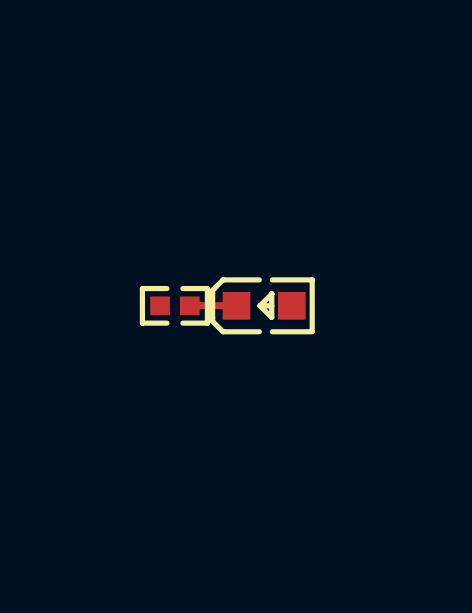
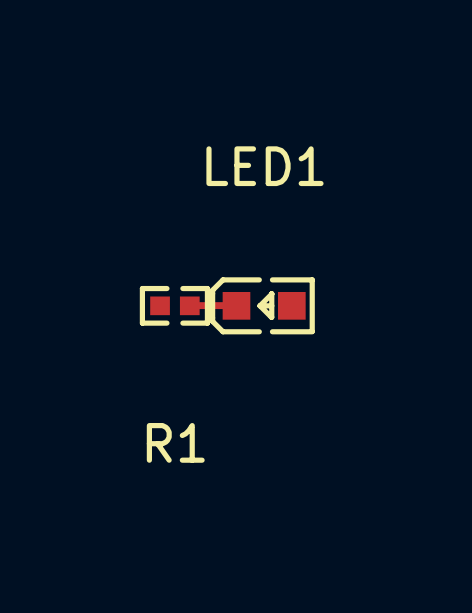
LED1 name: none -> LED1 (264, 166)
R1 name: none -> R1 (175, 442)

